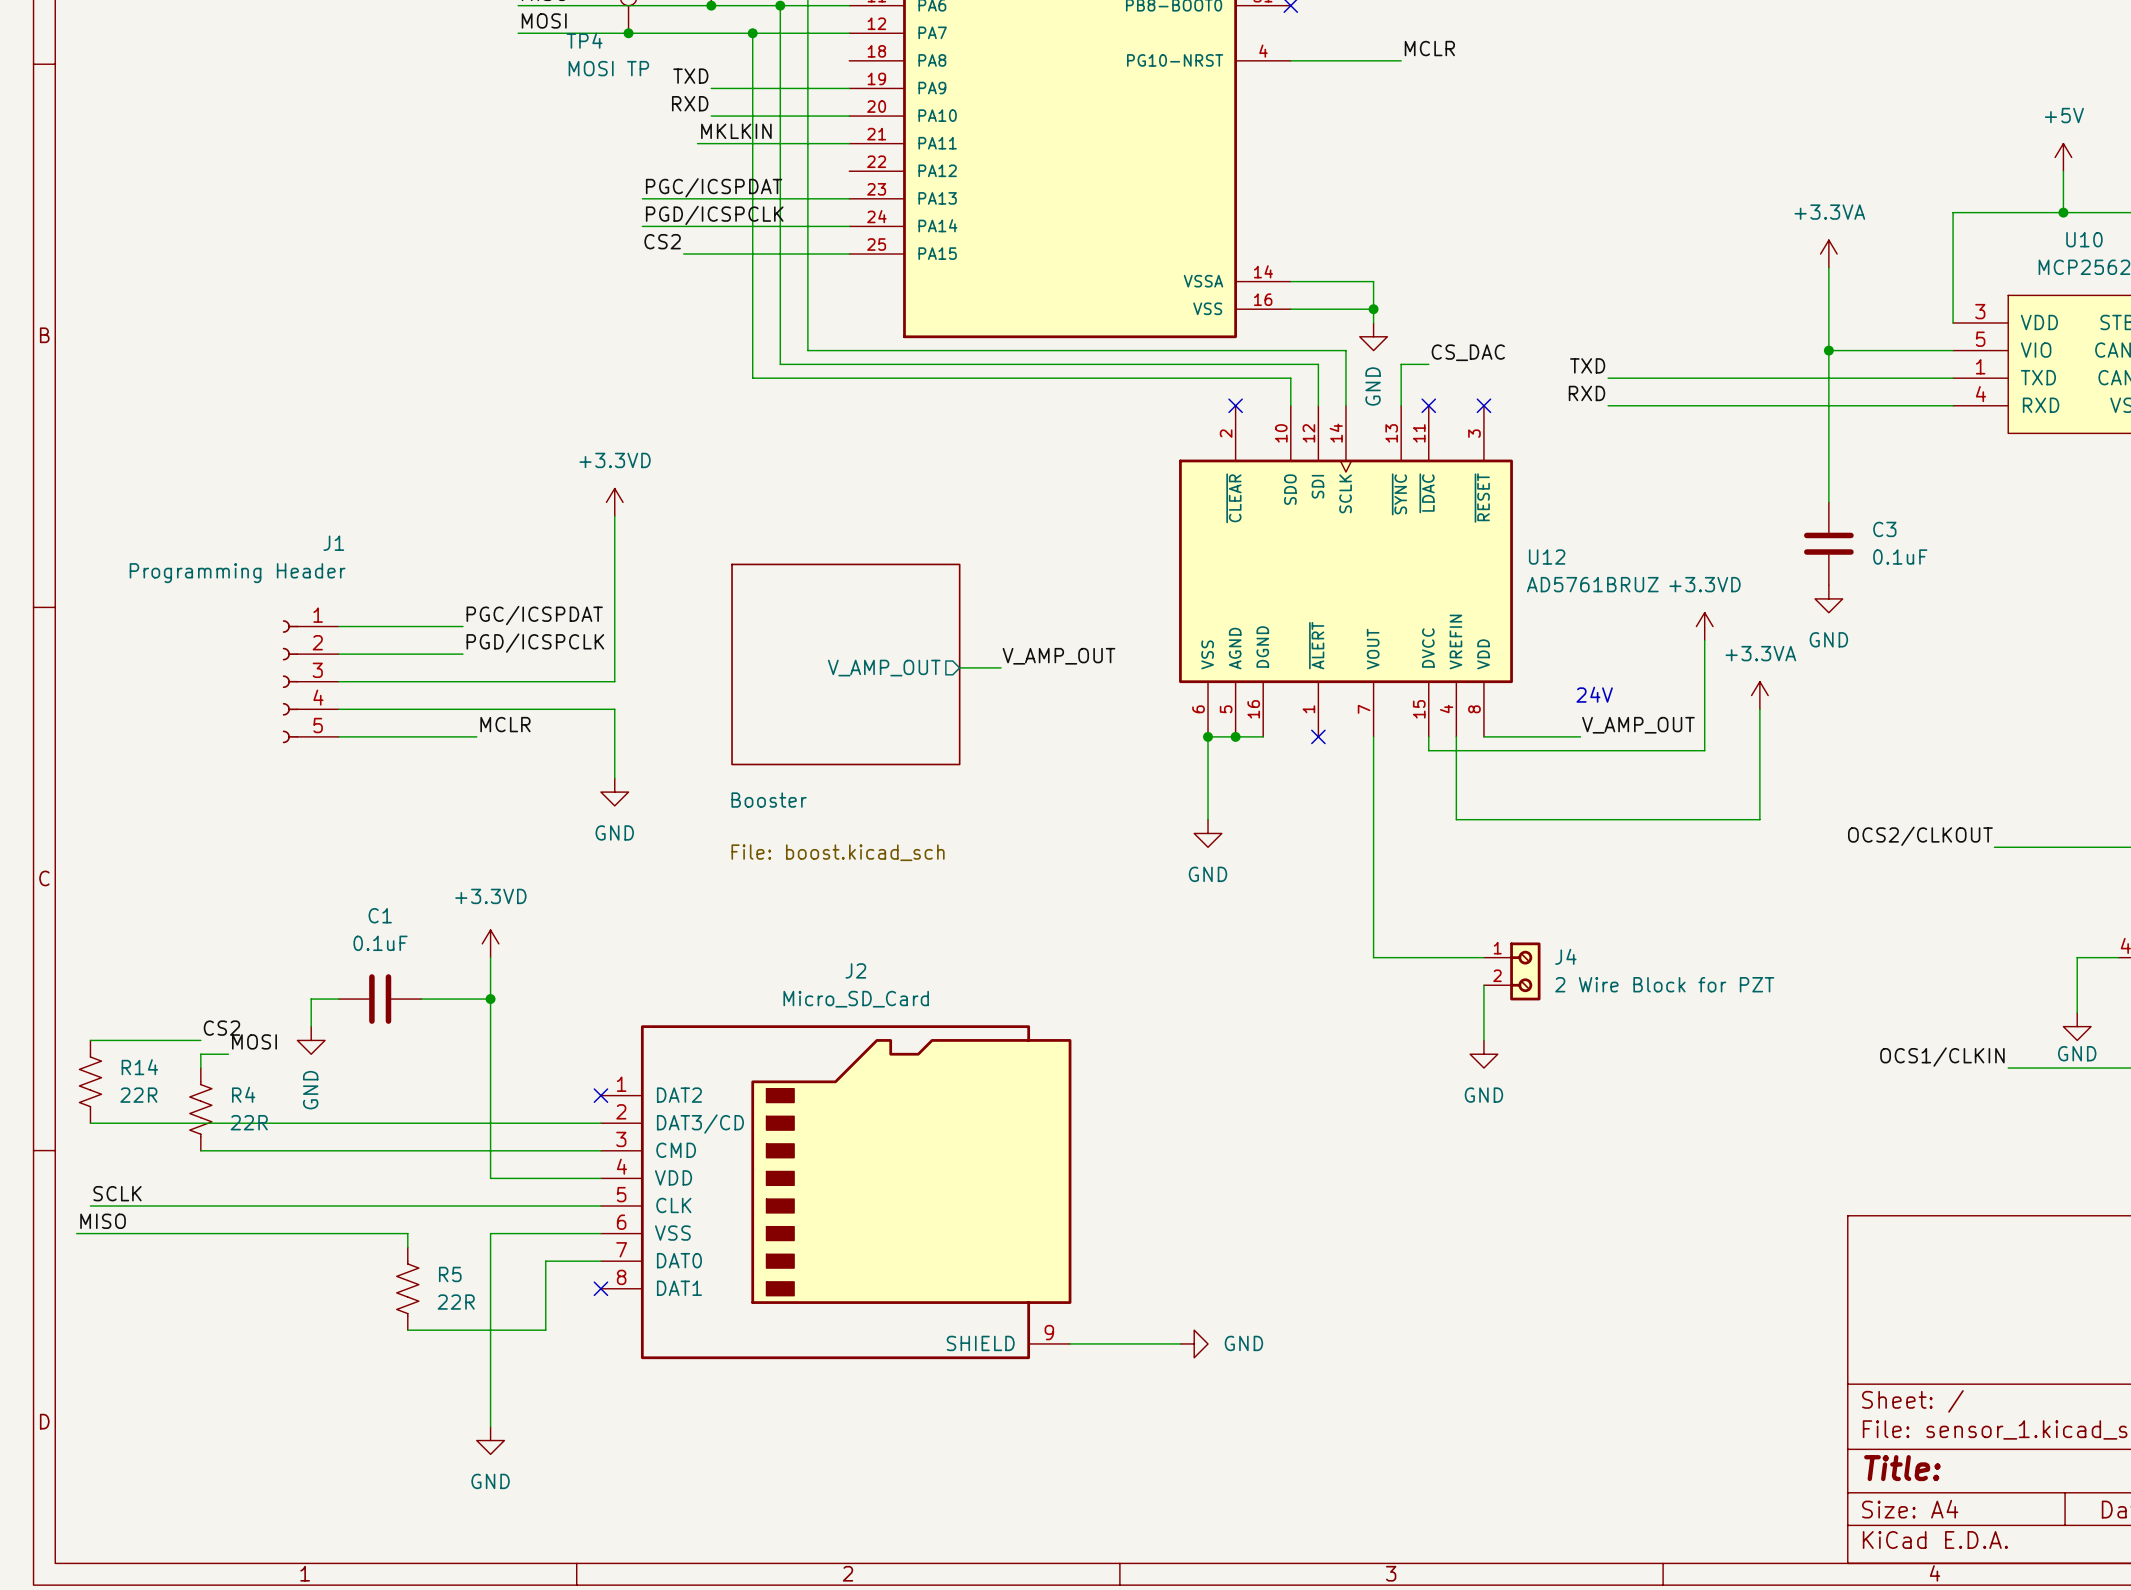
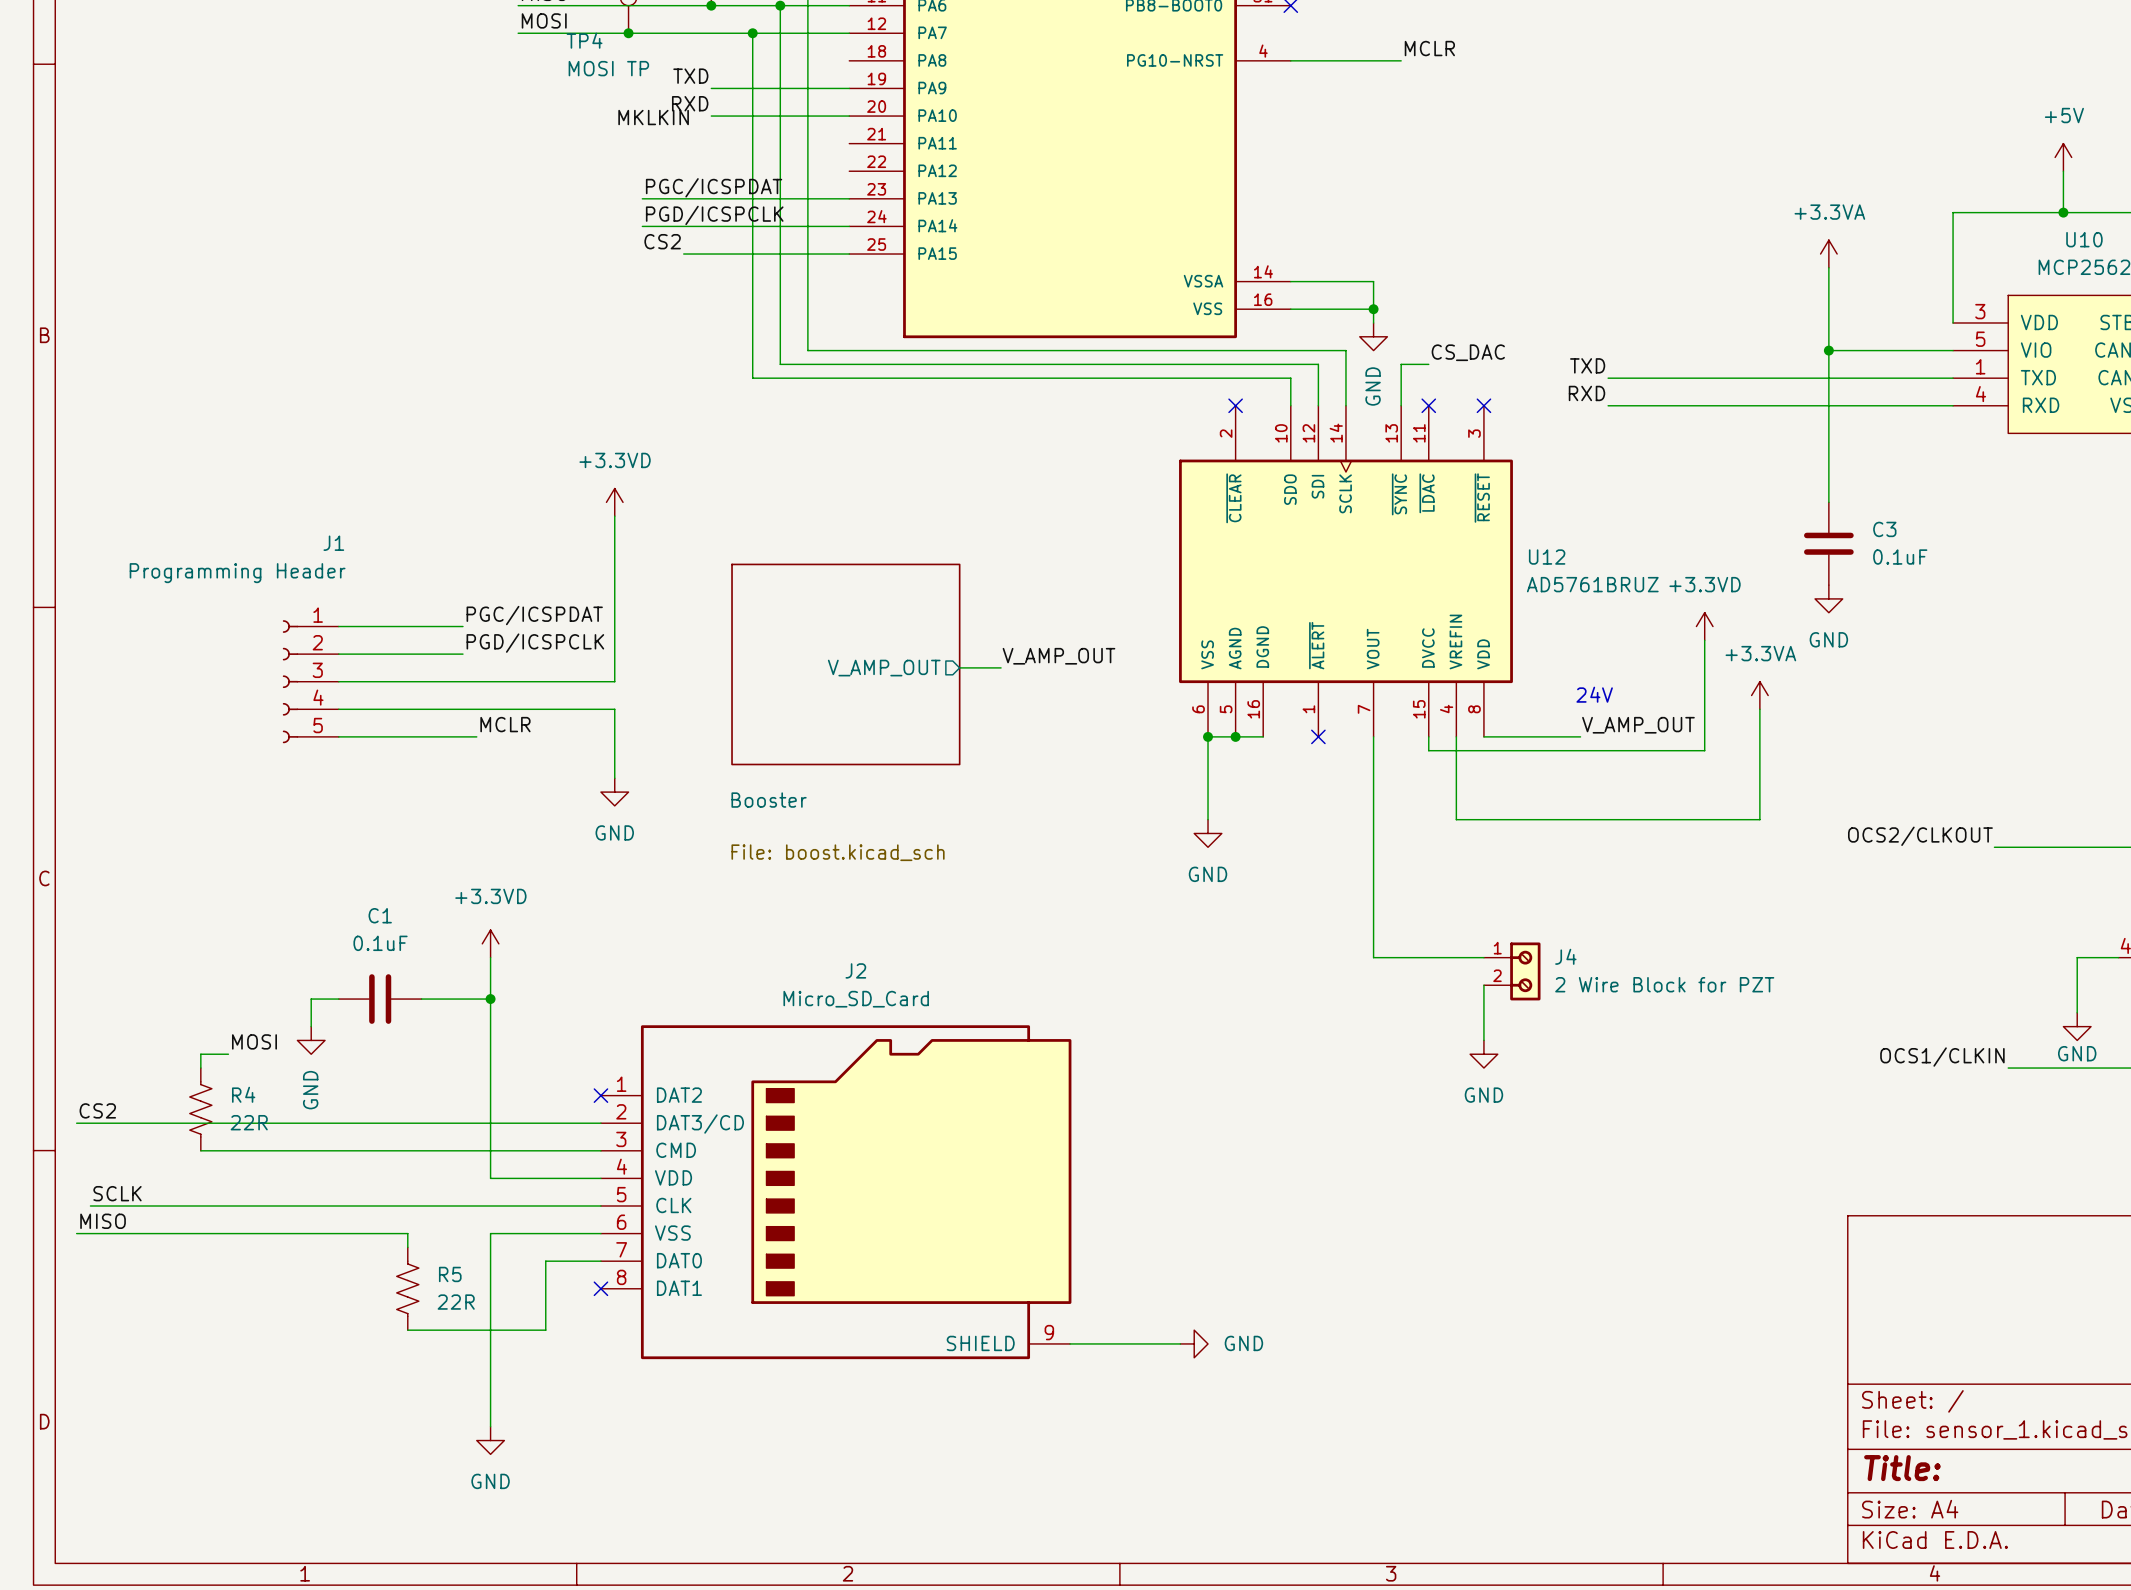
label position: MKLKIN (736, 131) -> MKLKIN (653, 117)
wire: (697, 143) (849, 143) -> none
label position: CS2 (221, 1028) -> CS2 (97, 1110)
wire: (90, 1040) (200, 1040) -> none
R14: 22R (90, 1081) -> none
wire: none -> (76, 1123) (90, 1123)

